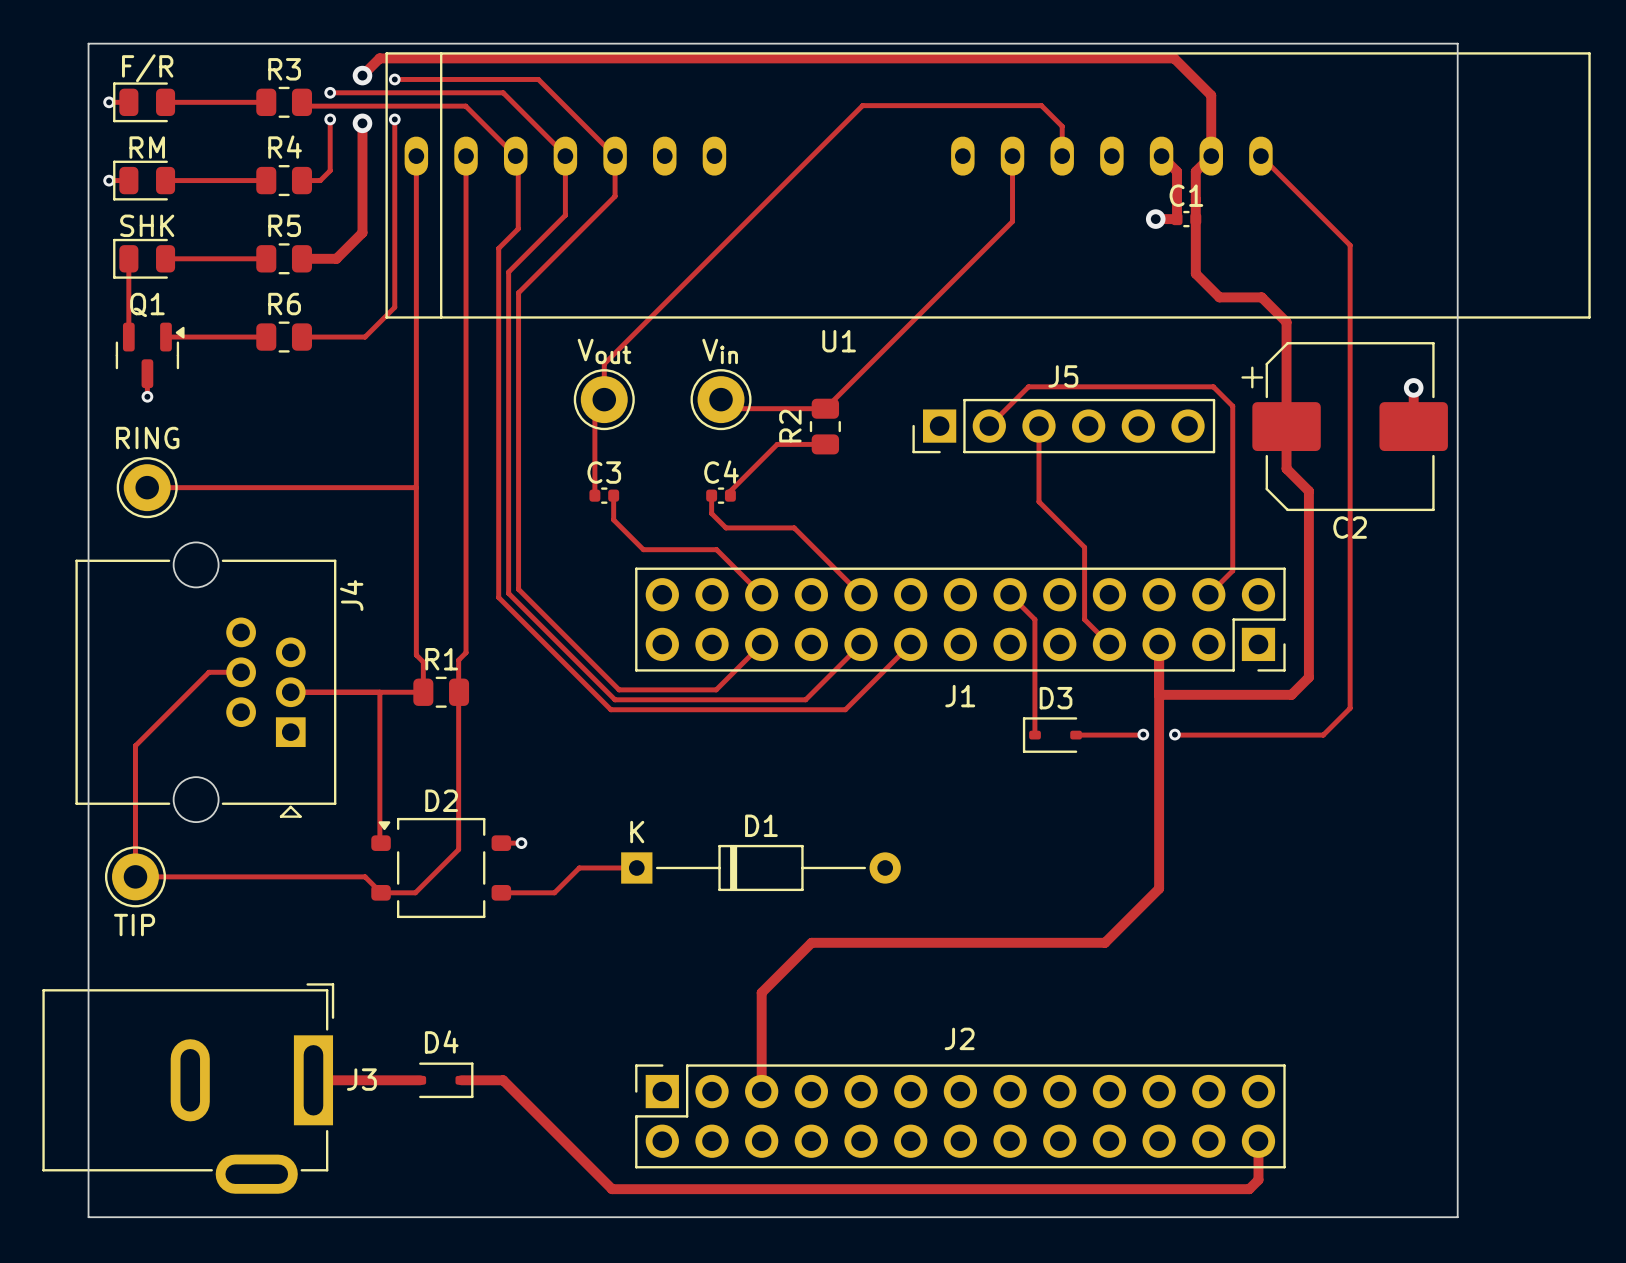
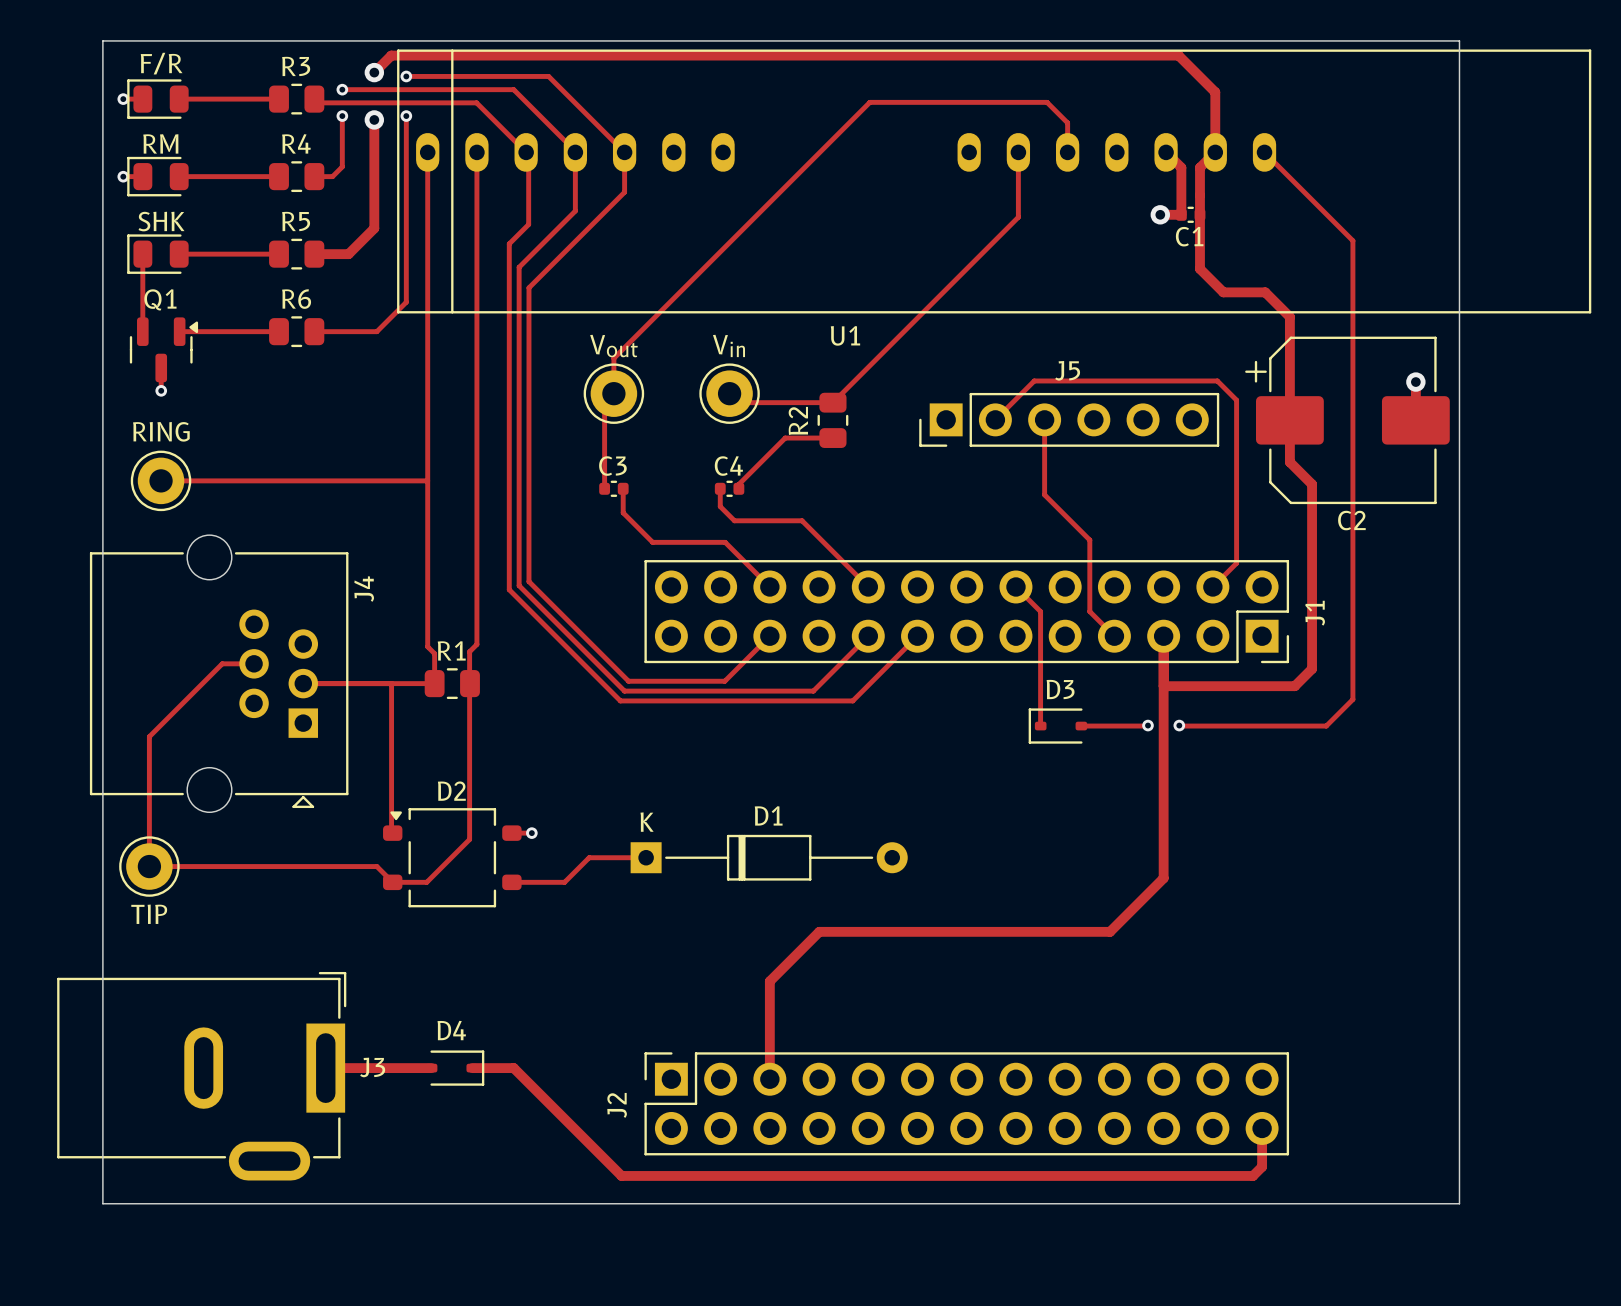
C1 name position: C1 (1186, 195) -> C1 (1189, 236)
J1 name rotation: 0° (960, 696) -> 90° counterclockwise (1315, 613)
J1 name position: J1 (960, 696) -> J1 (1315, 613)
J2 name rotation: 0° (959, 1038) -> 90° counterclockwise (617, 1105)
J2 name position: J2 (959, 1038) -> J2 (617, 1105)

